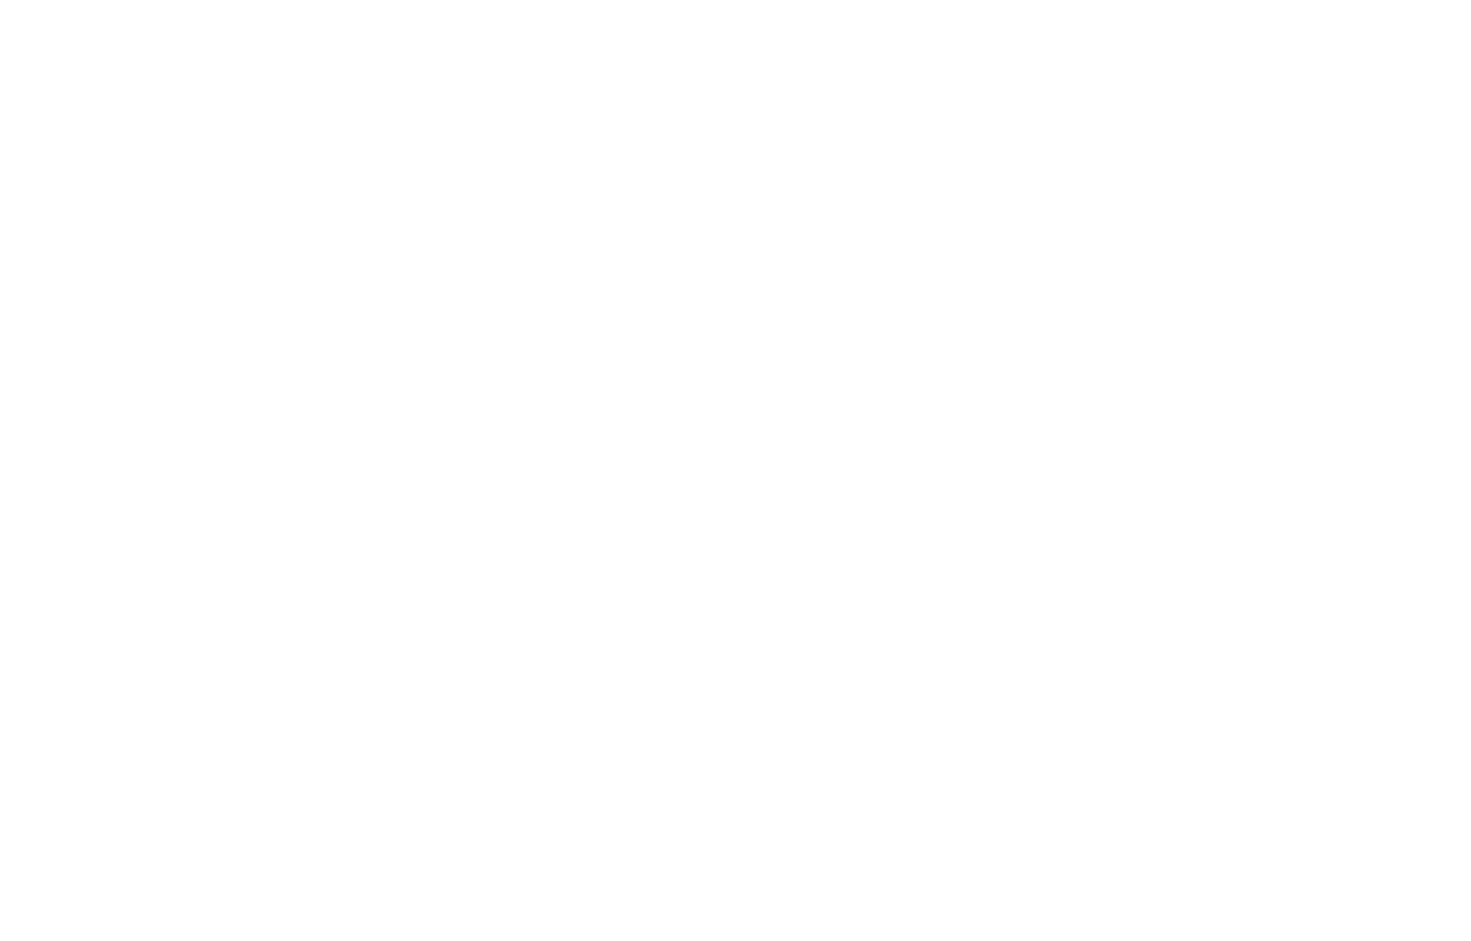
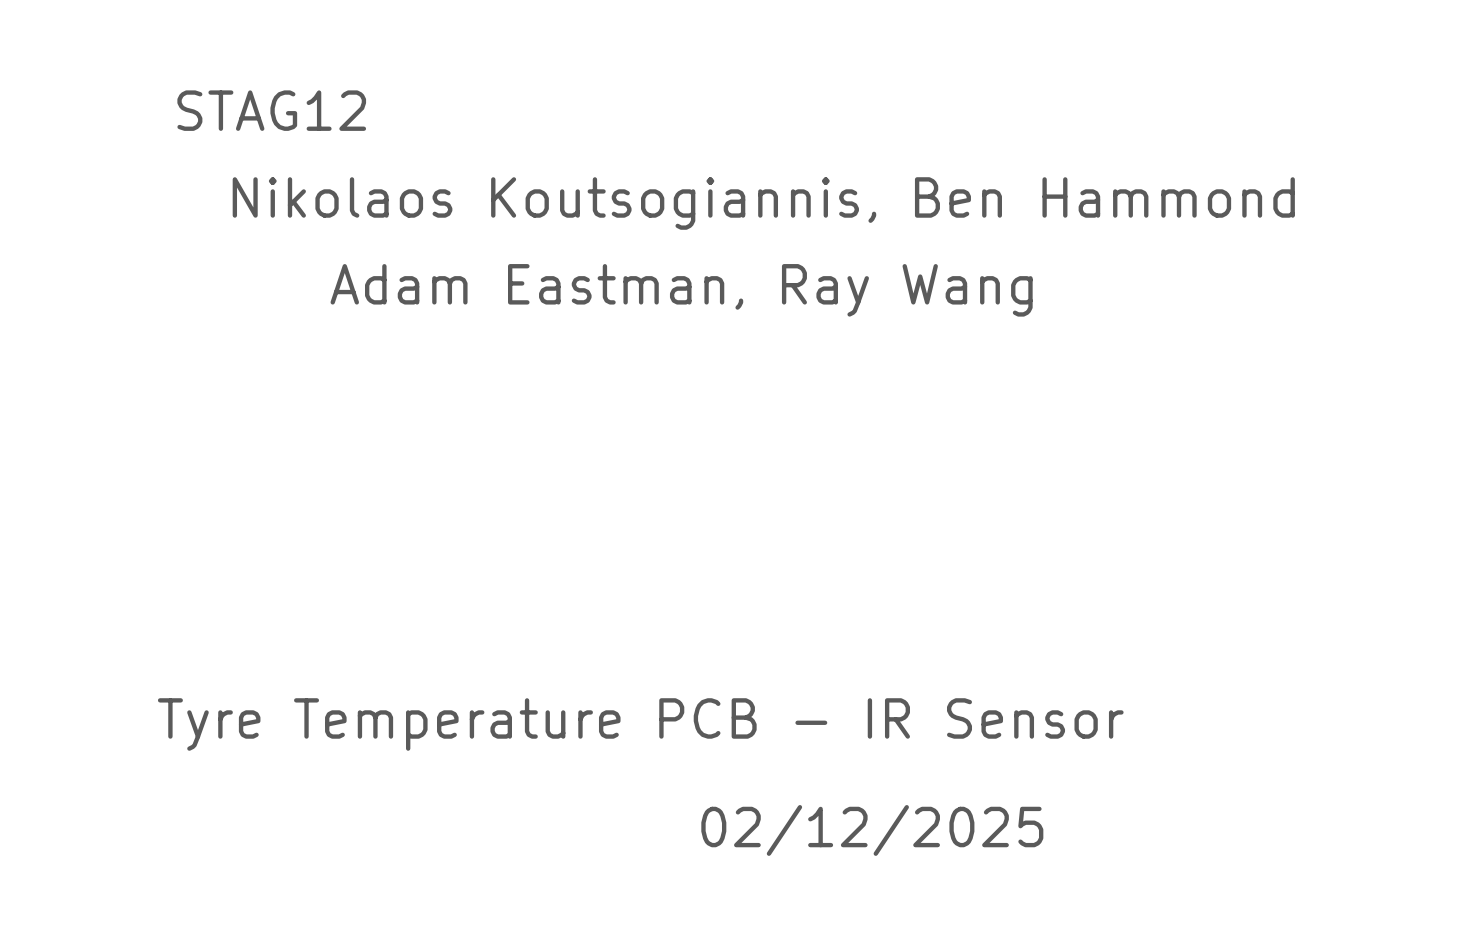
text: none -> STAG12 (271, 110)
text: none -> Nikolaos Koutsogiannis, Ben Hammond (763, 203)
text: none -> Adam Eastman, Ray Wang (681, 290)
text: none -> Tyre Temperature PCB - IR Sensor (640, 724)
text: none -> 02/12/2025 (872, 830)

